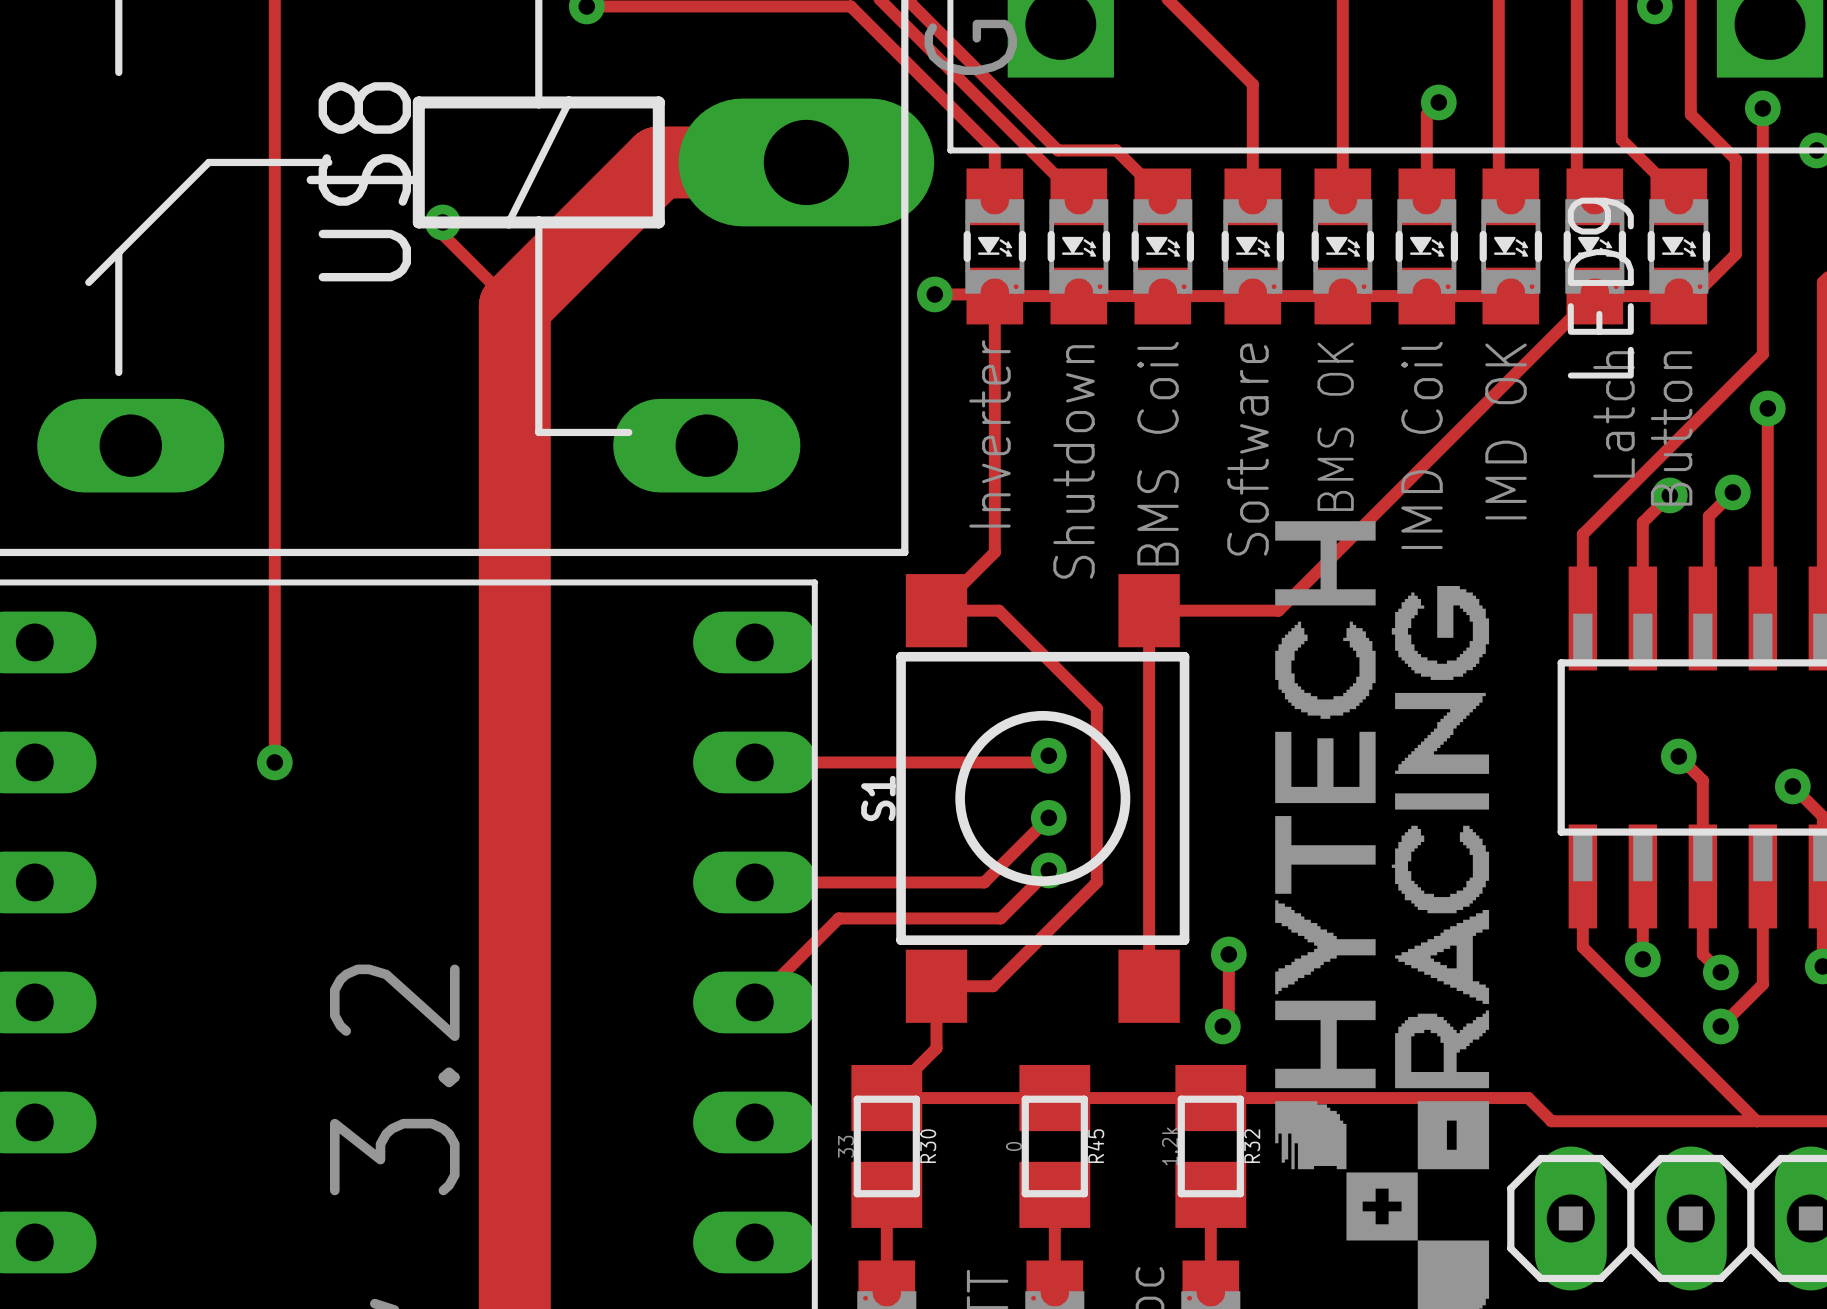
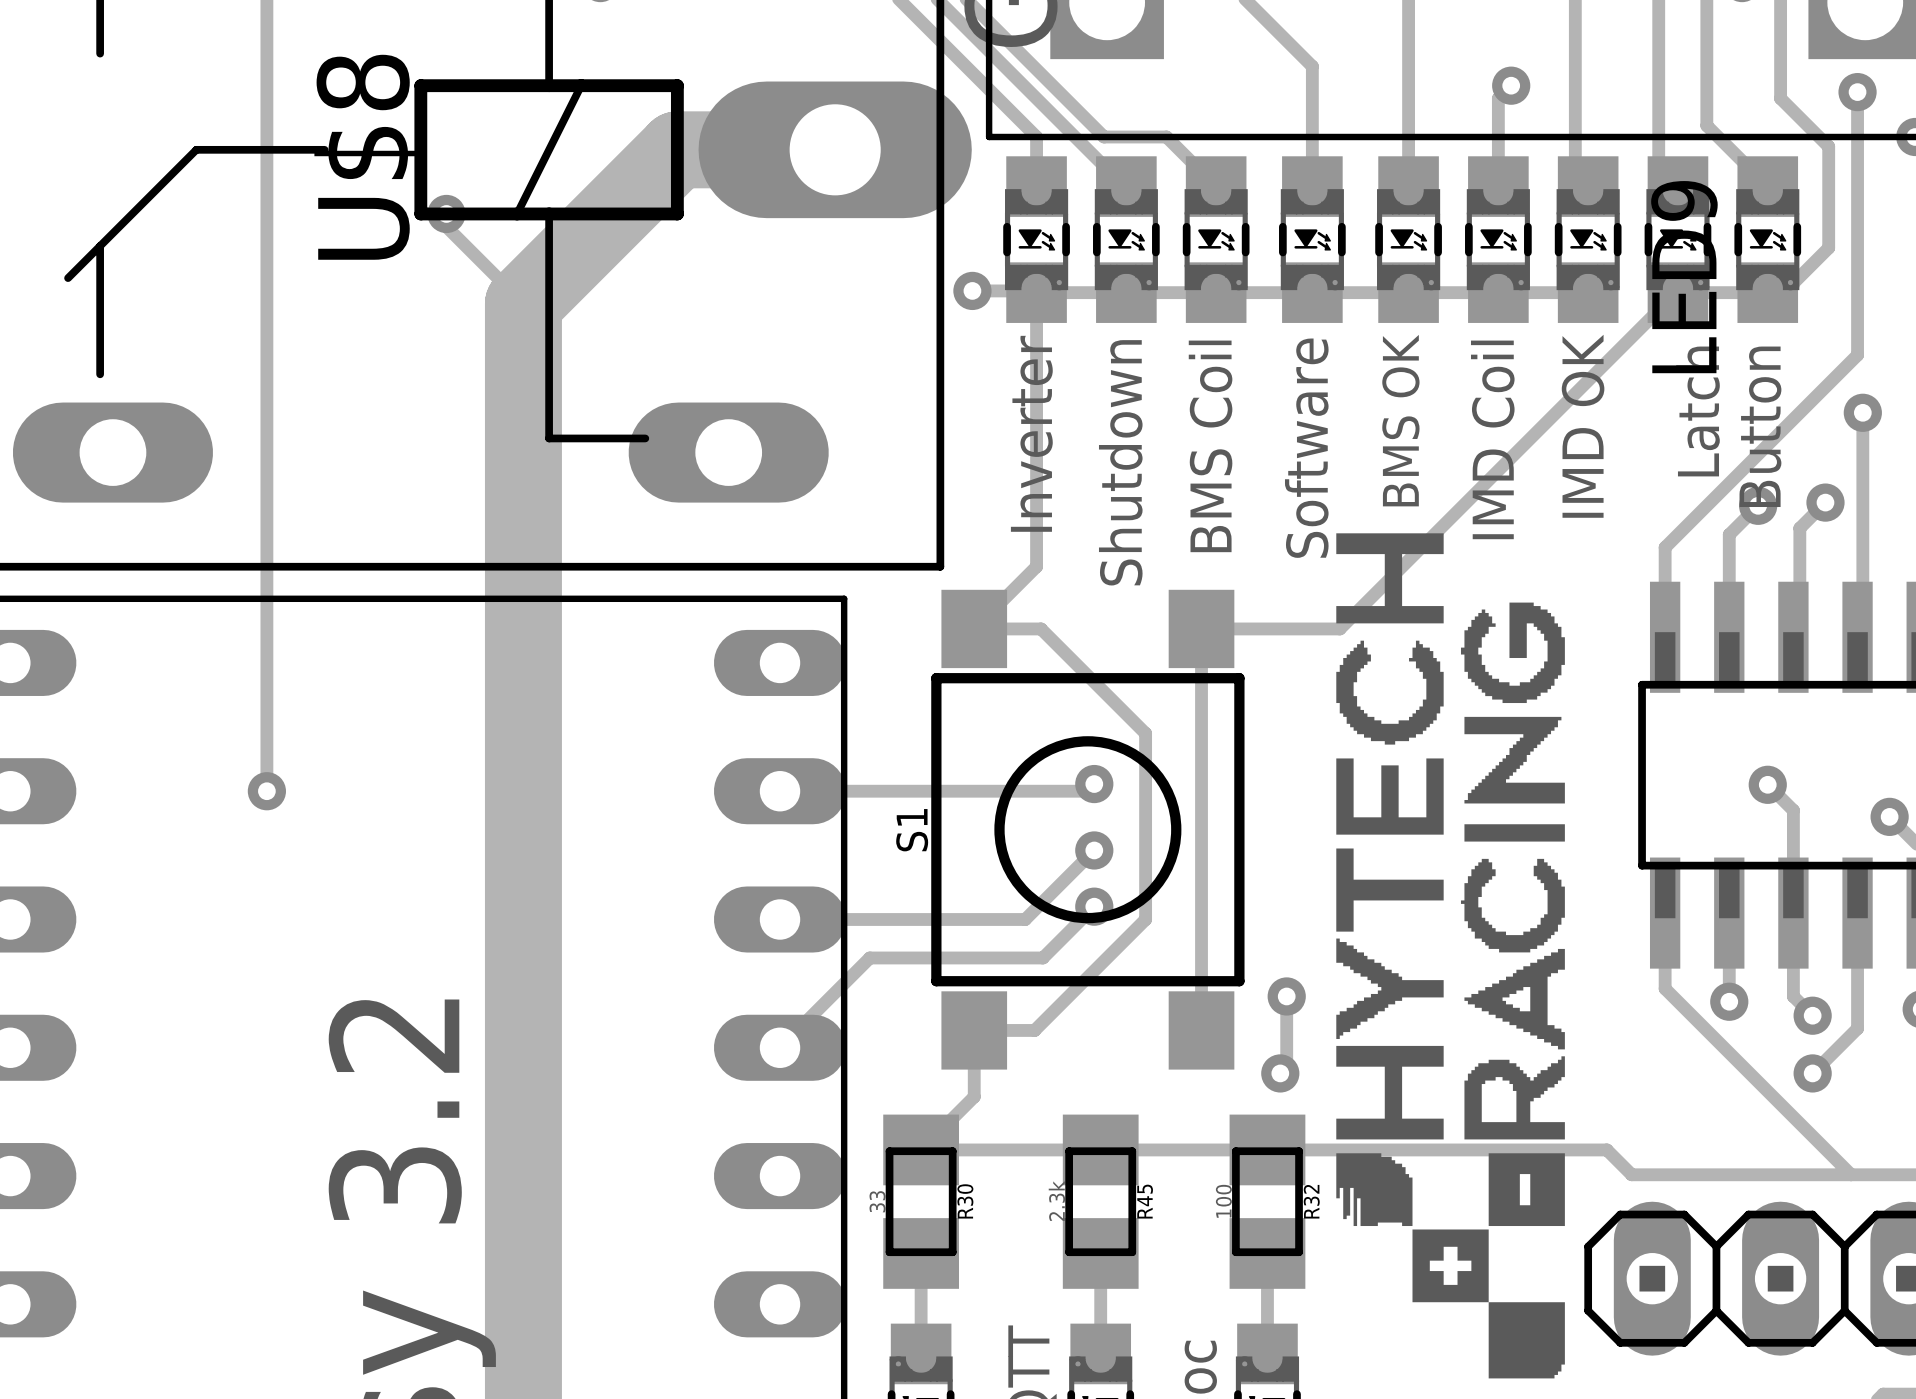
R45 value: 0 (1014, 1146) -> 2.3k (1056, 1201)
R32 value: 1.2k (1170, 1146) -> 100 (1223, 1201)

